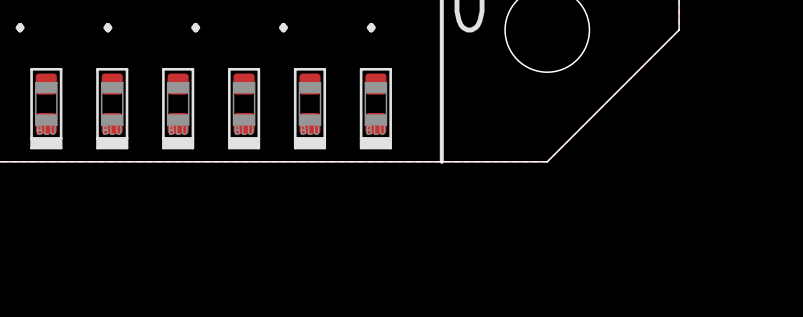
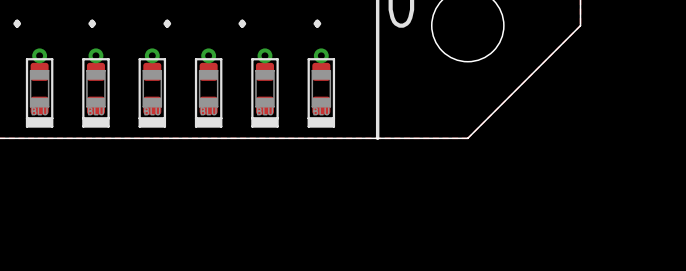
via: none -> (39, 55)
via: none -> (95, 55)
via: none -> (152, 55)
via: none -> (208, 55)
via: none -> (264, 55)
via: none -> (321, 55)

